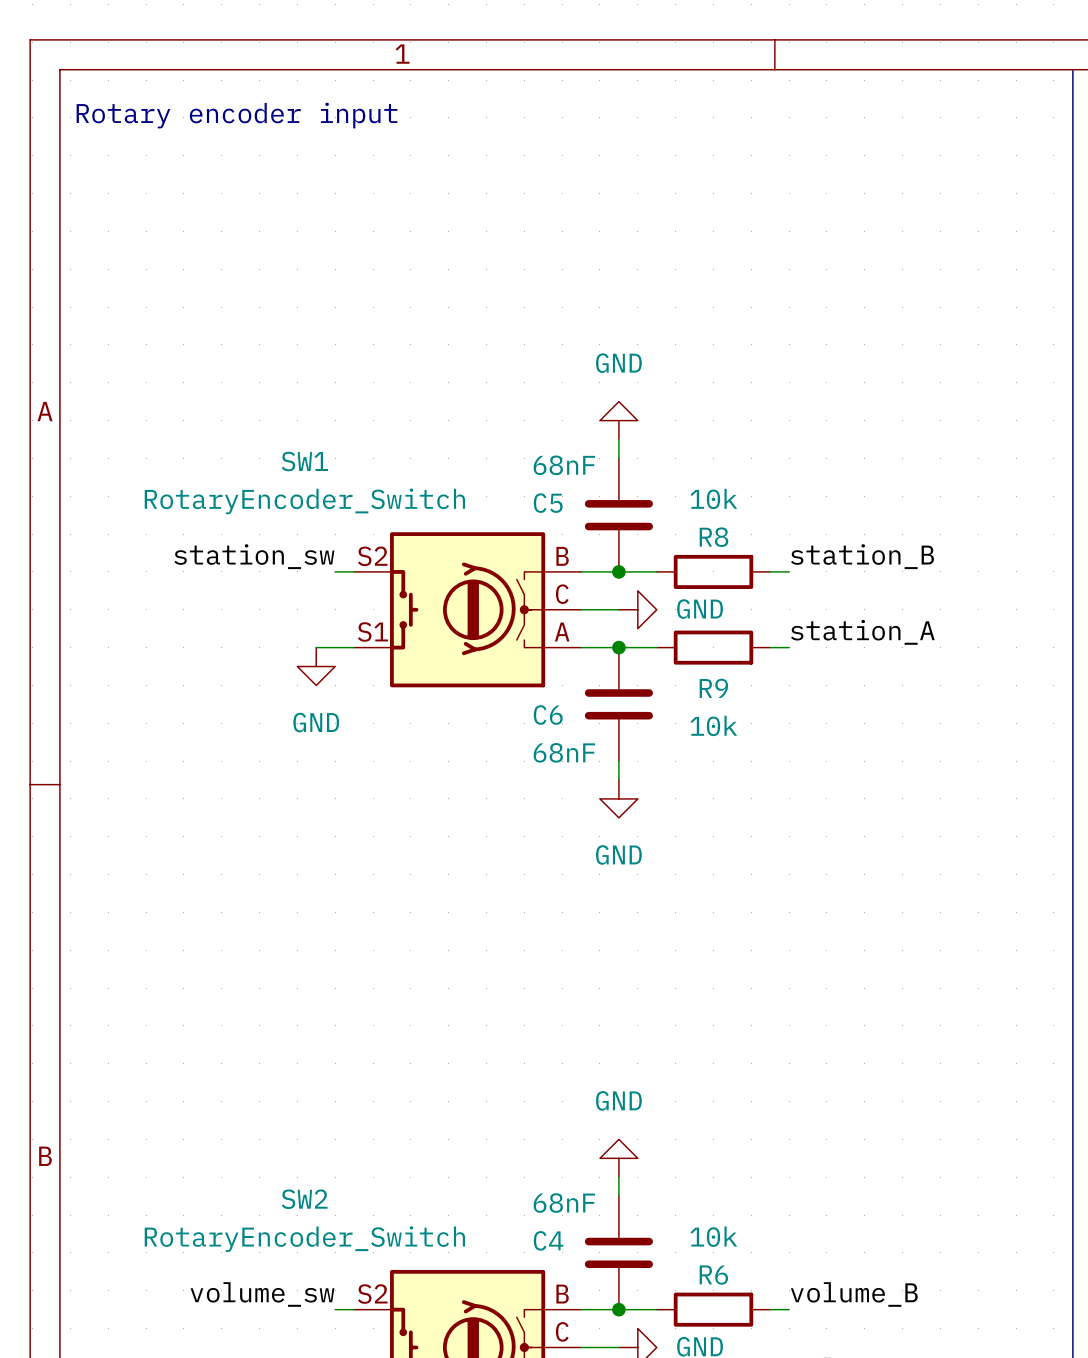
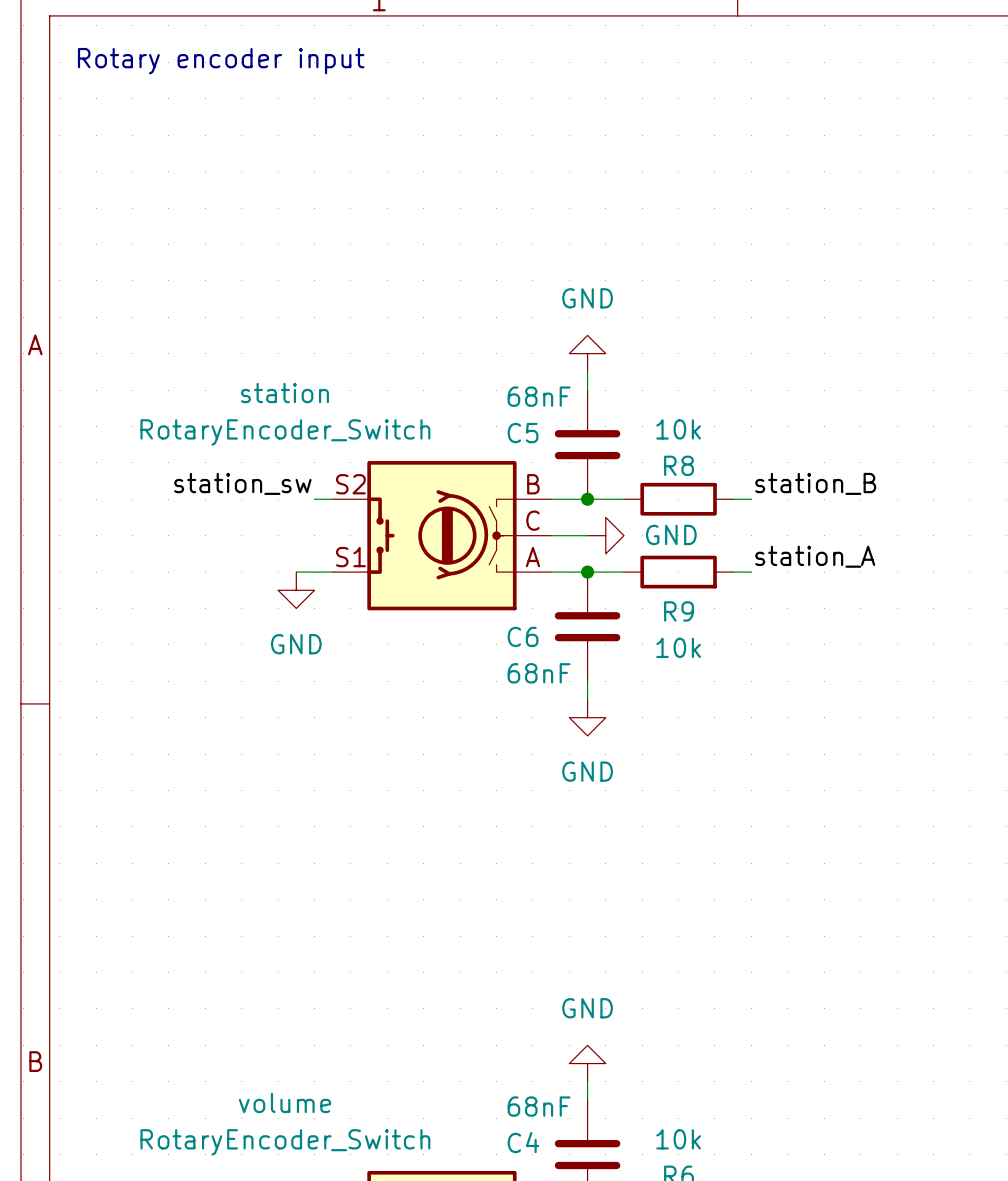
SW1 name: SW1 (304, 461) -> station (284, 393)
SW2 name: SW2 (304, 1199) -> volume (284, 1102)

